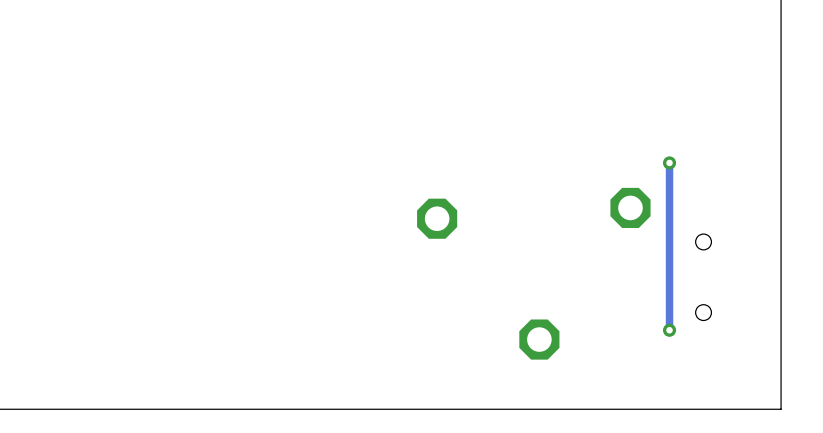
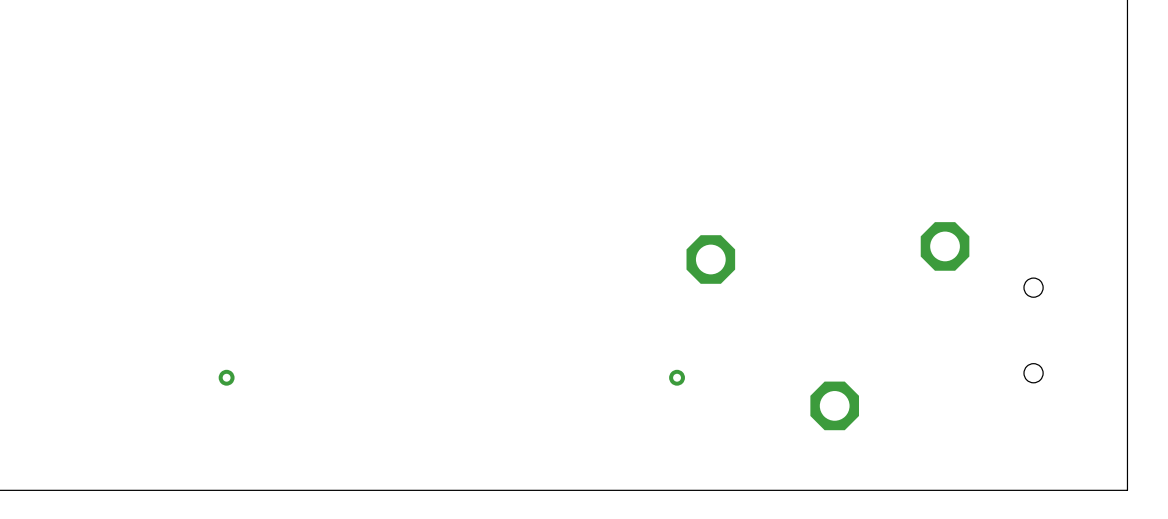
track: (669, 162) (669, 330) -> none
via: (669, 162) -> none
via: none -> (226, 377)
via: none -> (677, 377)
via: (669, 330) -> none

